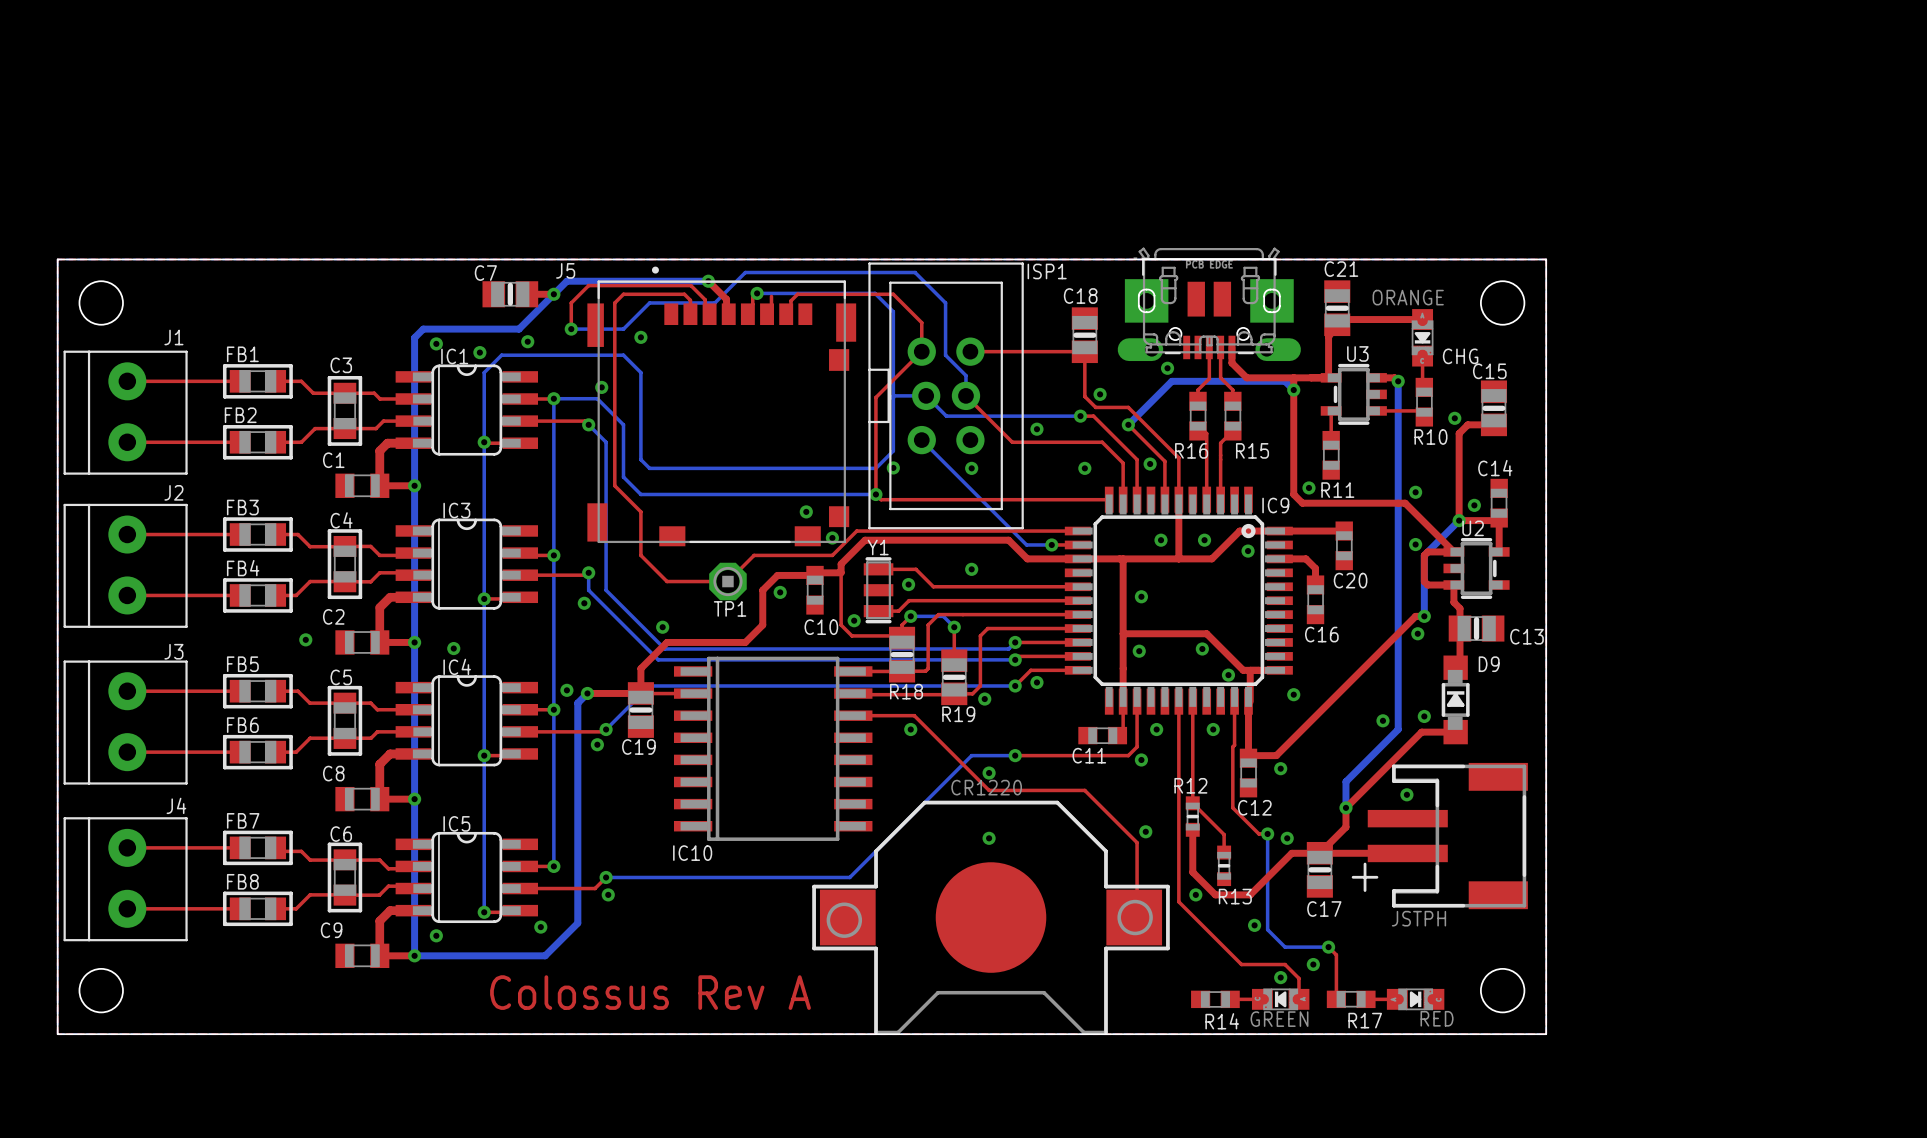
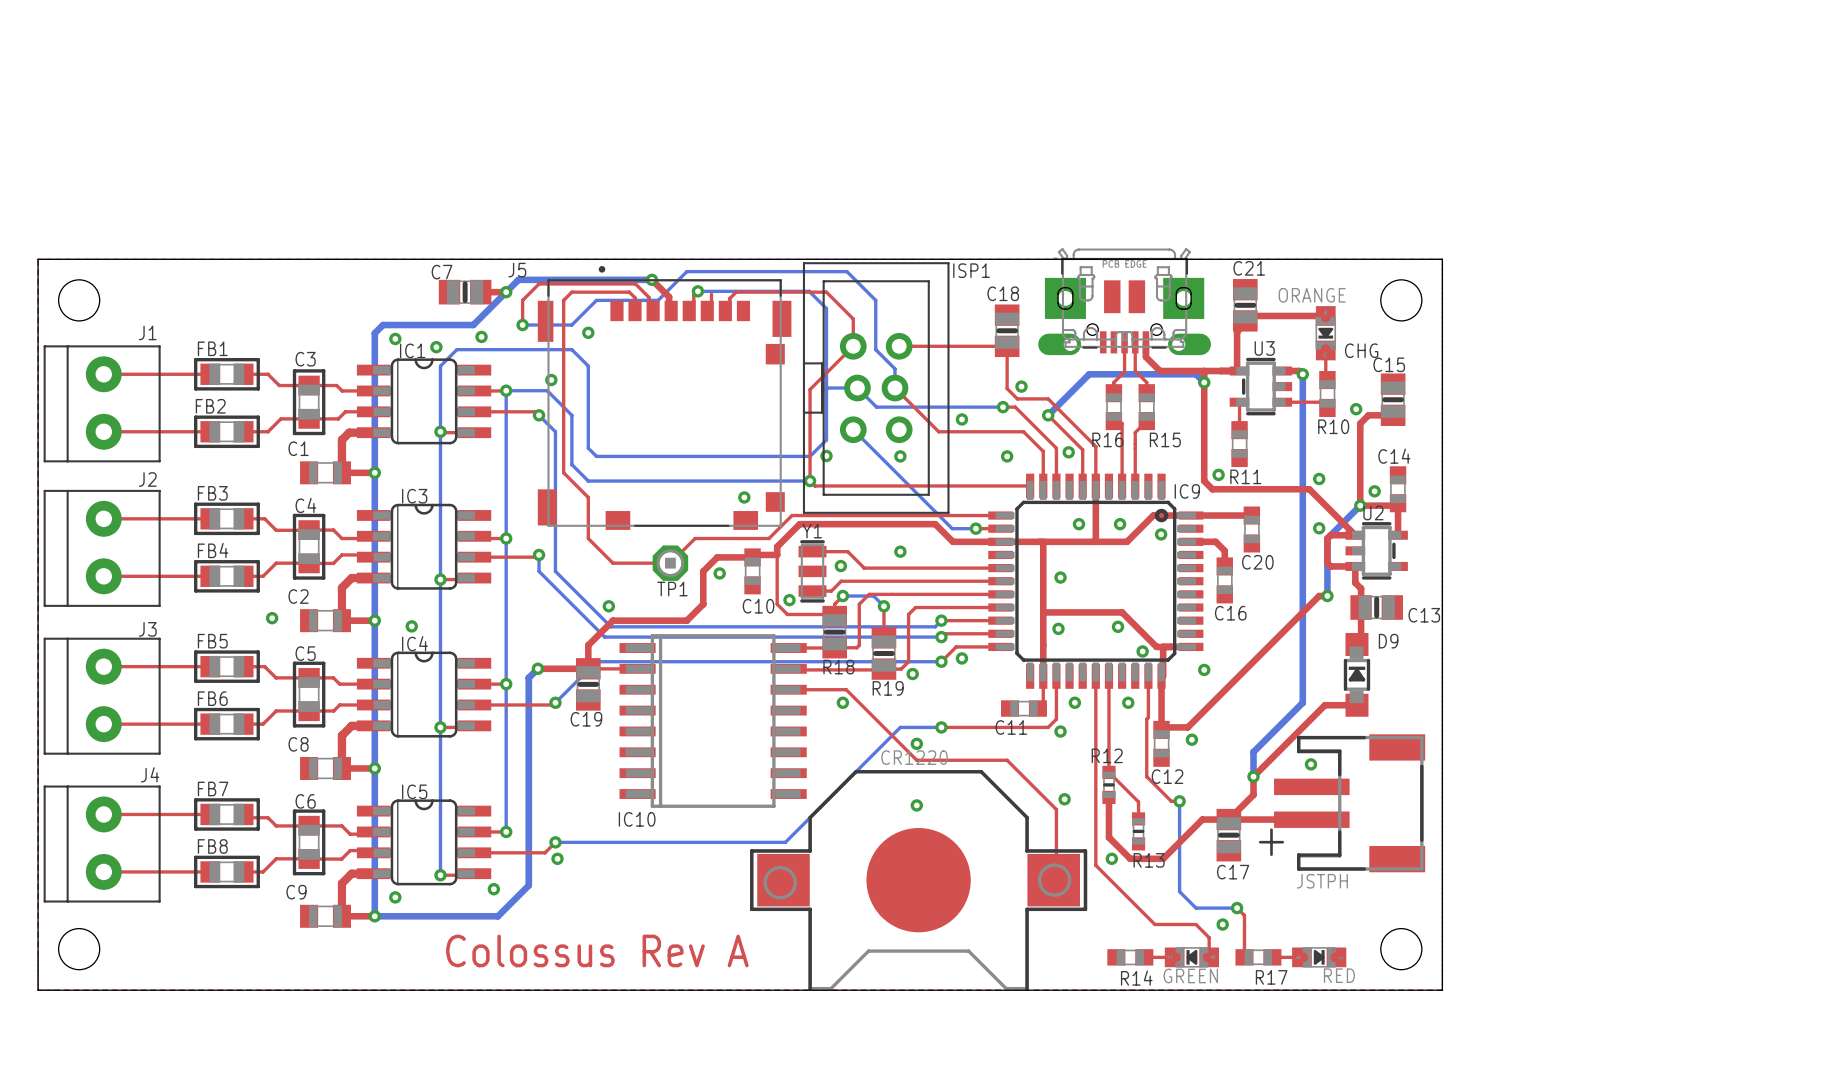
via: (1167, 368) -> none
via: (832, 538) -> none
via: (584, 603) -> none
via: (1417, 633) -> none
via: (566, 690) -> none
via: (1424, 716) -> none
via: (1382, 720) -> none
via: (597, 744) -> none
via: (1287, 838) -> none
via: (1254, 925) -> none
via: (1280, 977) -> none

